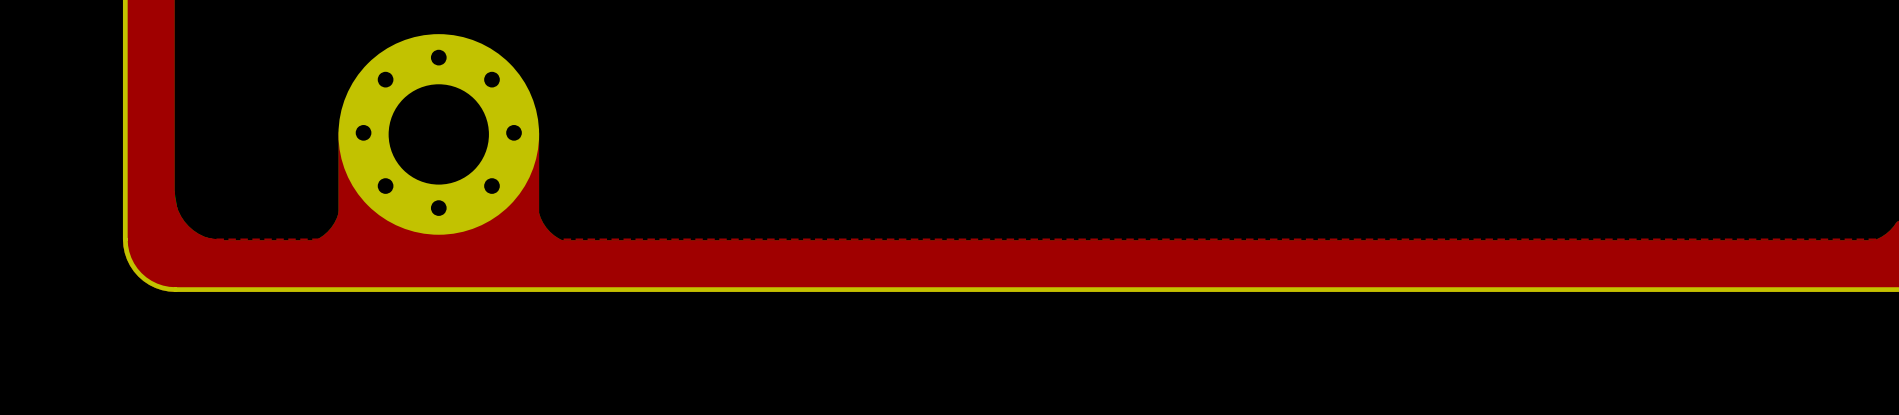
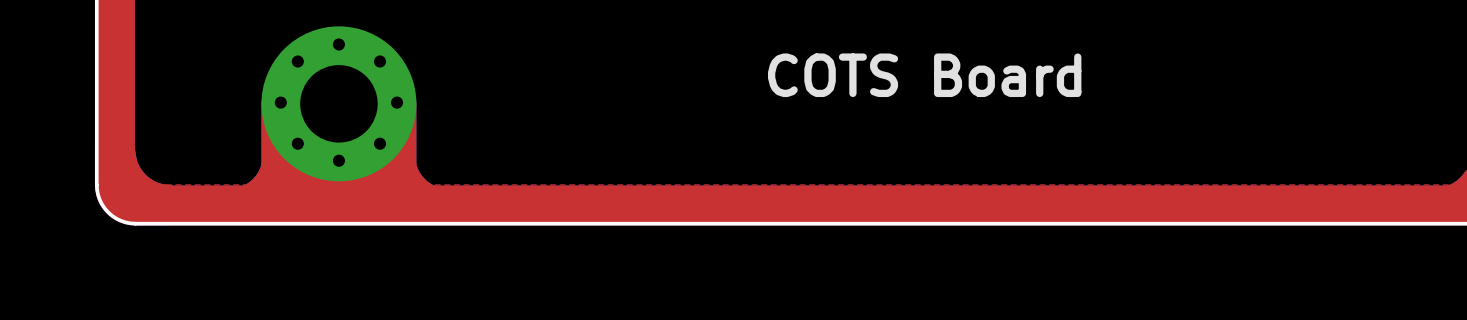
text: none -> COTS Board (924, 75)

